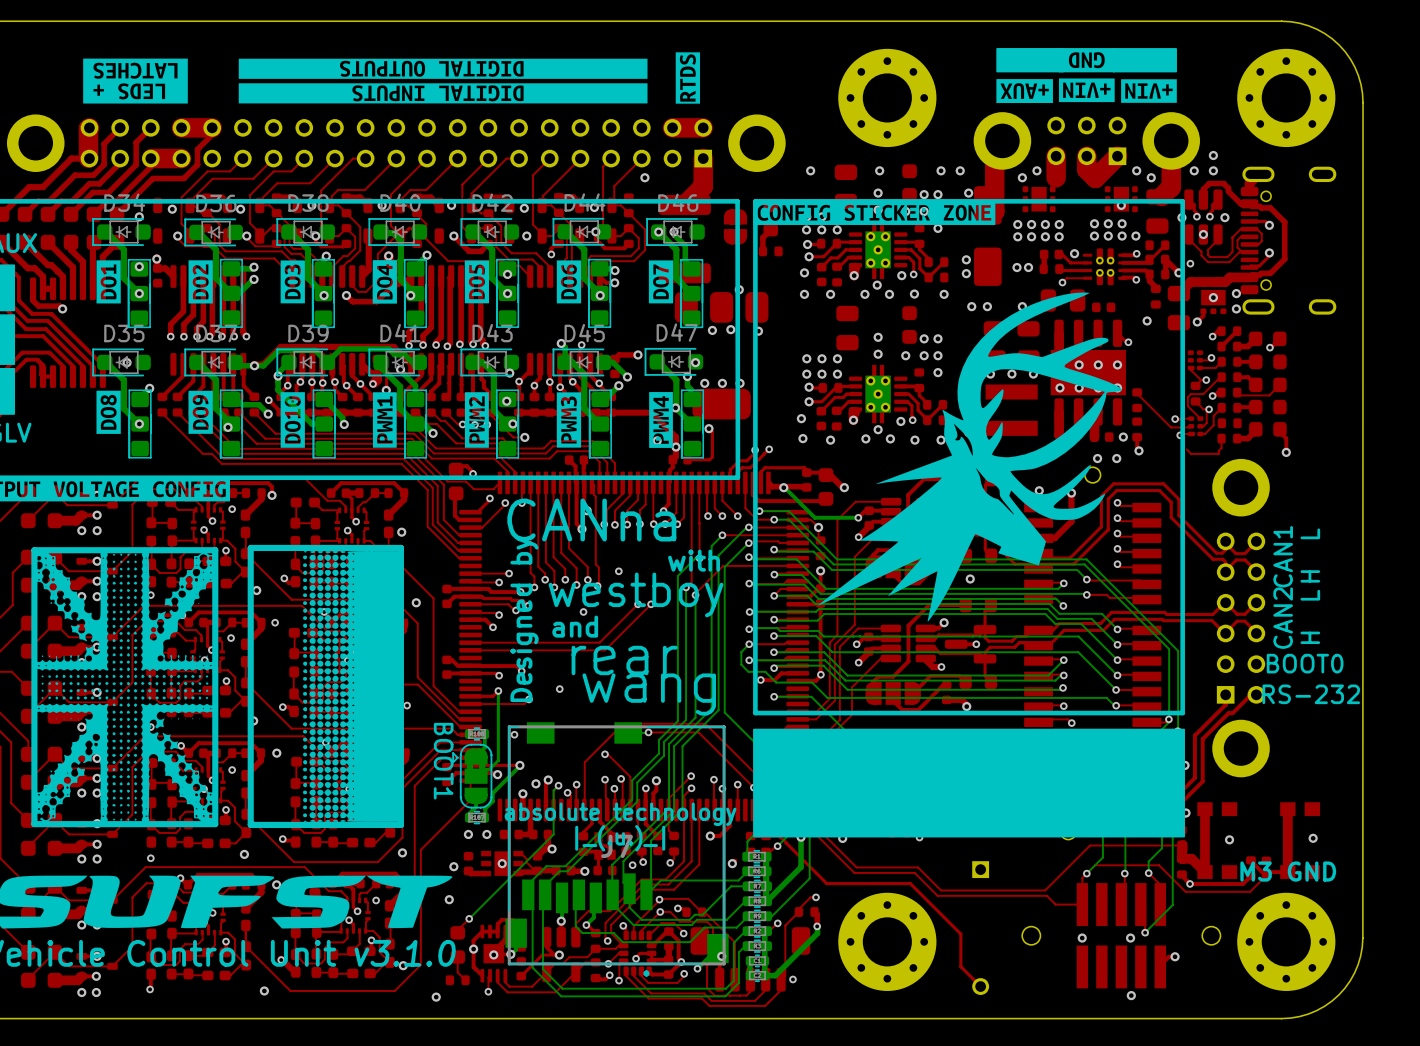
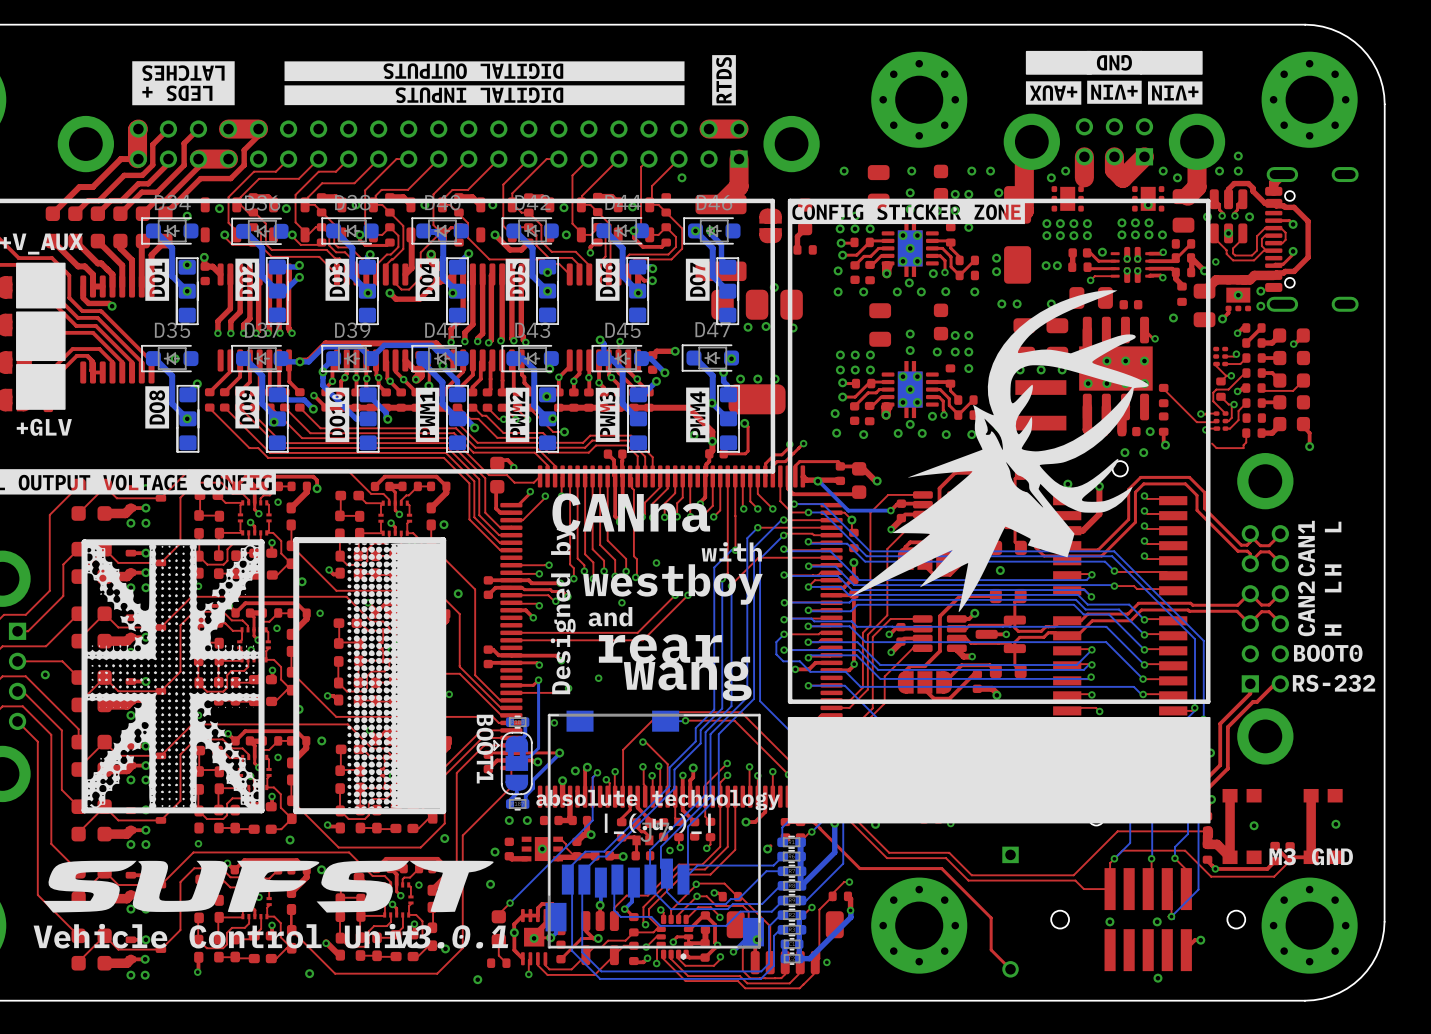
text: v3.1.0 (405, 953) -> v3.0.1 (451, 936)

